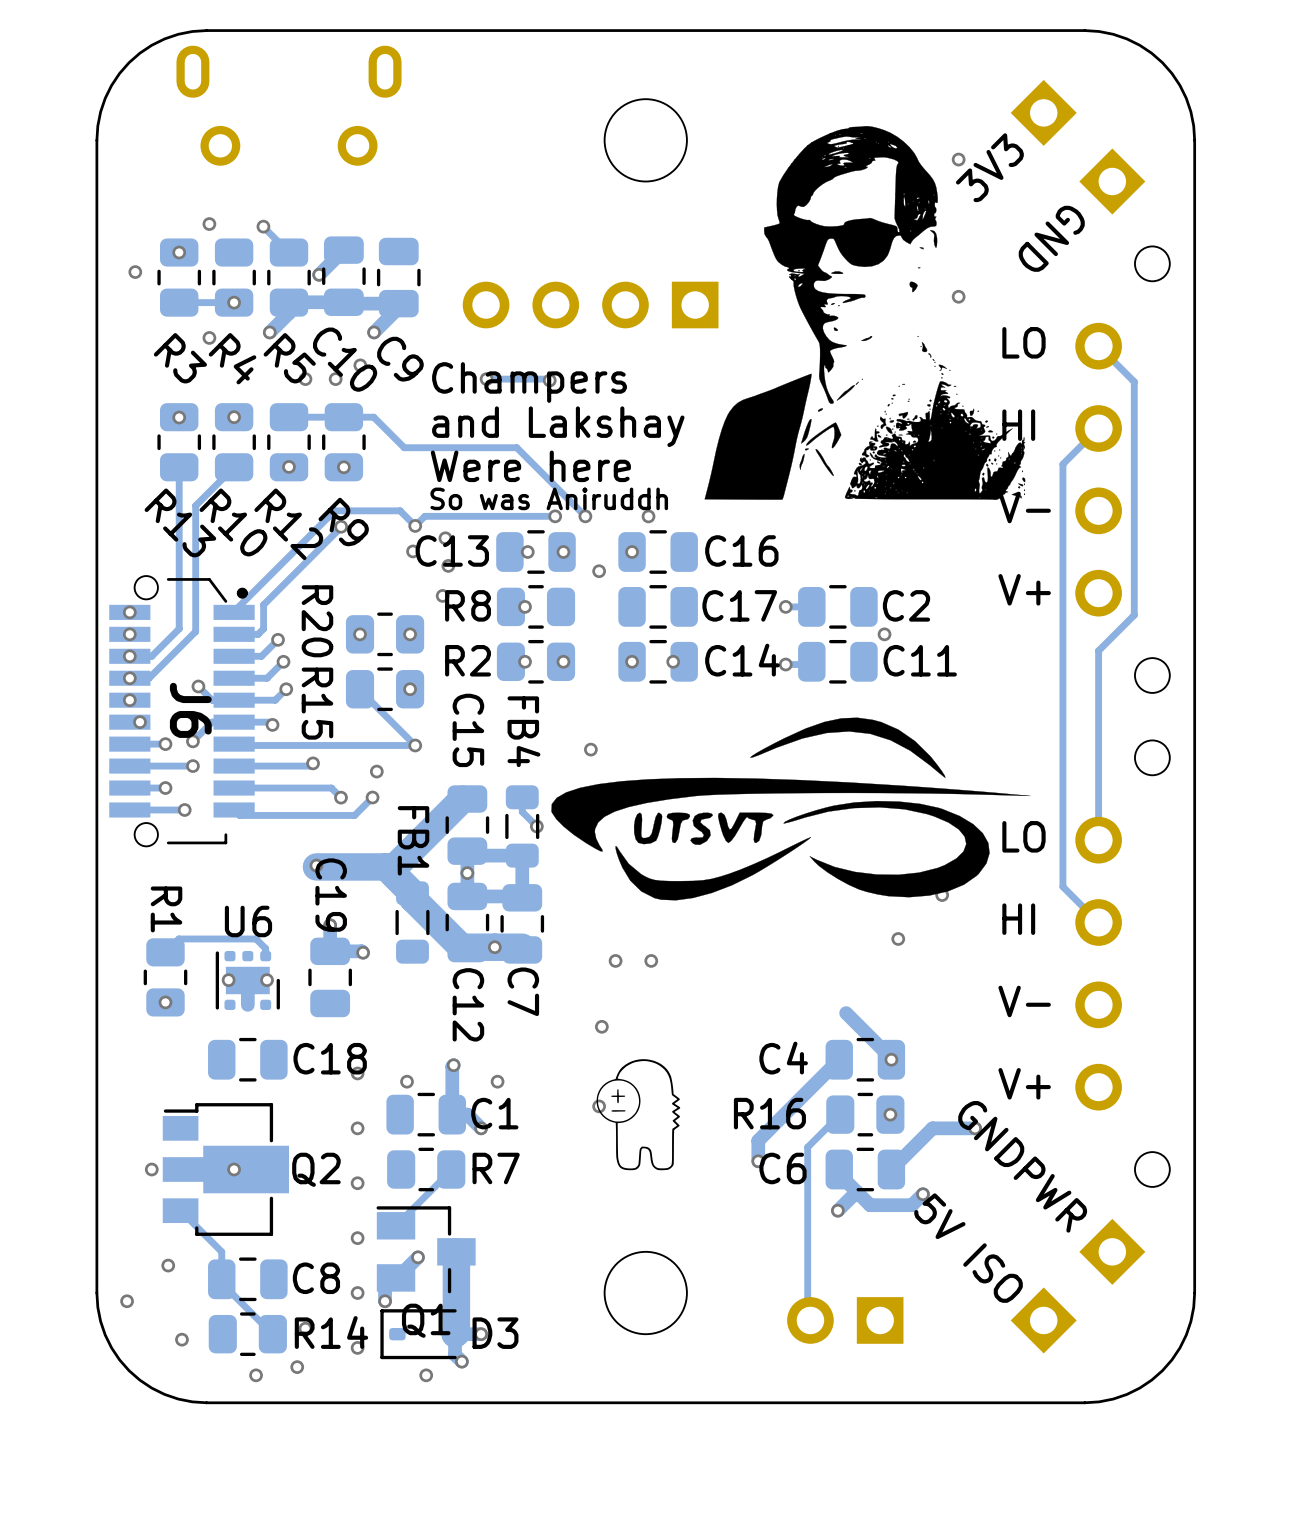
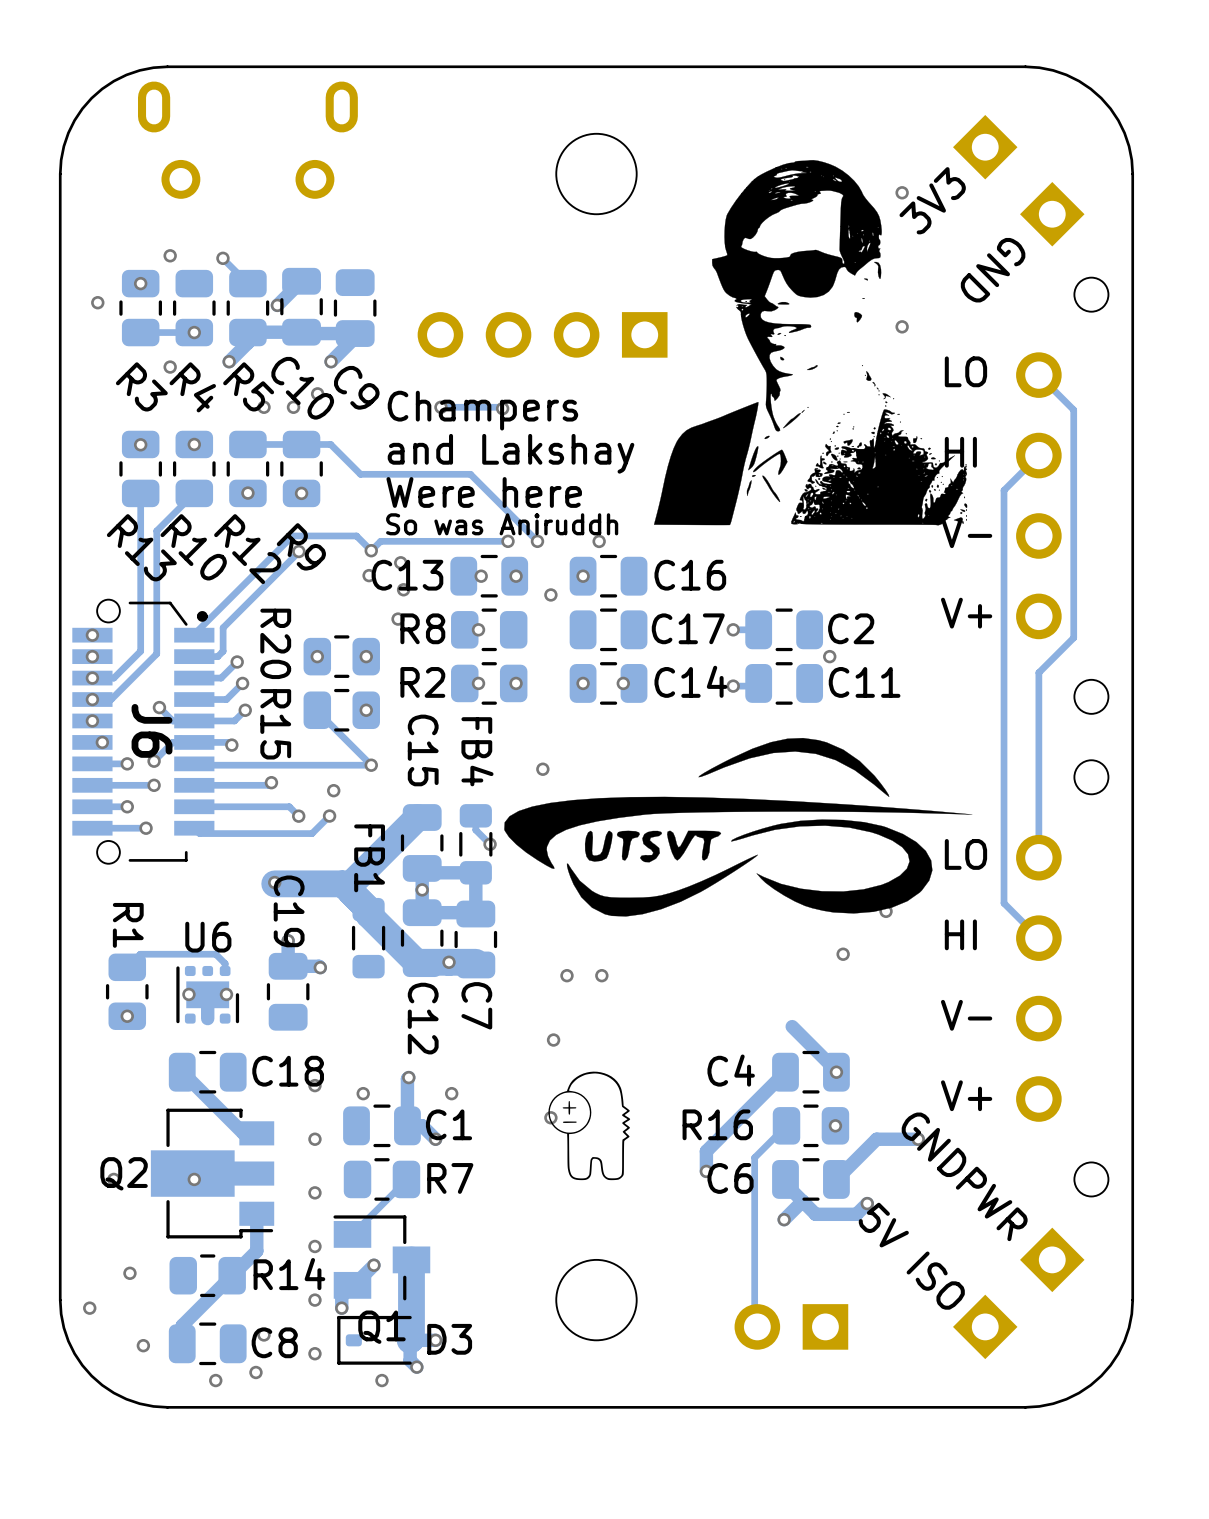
track: none -> (182, 1072) (243, 1133) (256, 1133)
Q2 rotation: 0° (225, 1169) -> 180° (212, 1173)
track: none -> (256, 1213) (256, 1251) (182, 1325) (182, 1343)
track: (180, 1210) (221, 1251) (221, 1283) (272, 1334) -> none
C8 position: (247, 1279) -> (207, 1343)
R14 position: (247, 1334) -> (207, 1275)

